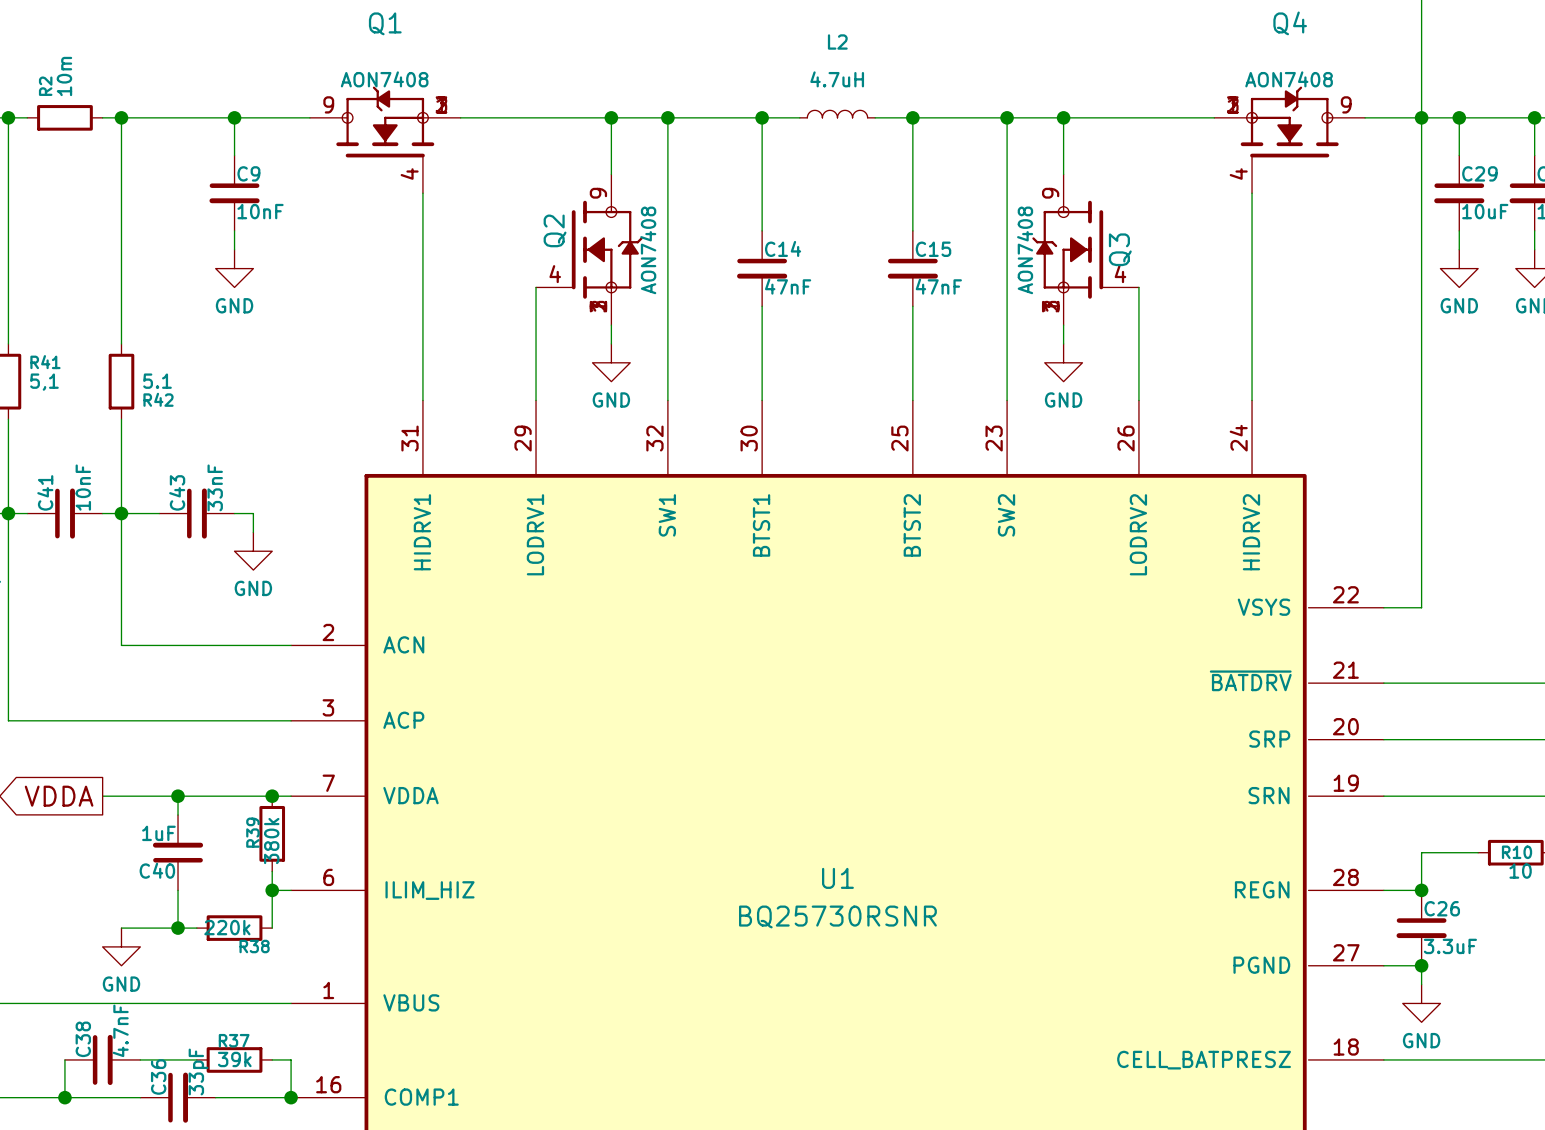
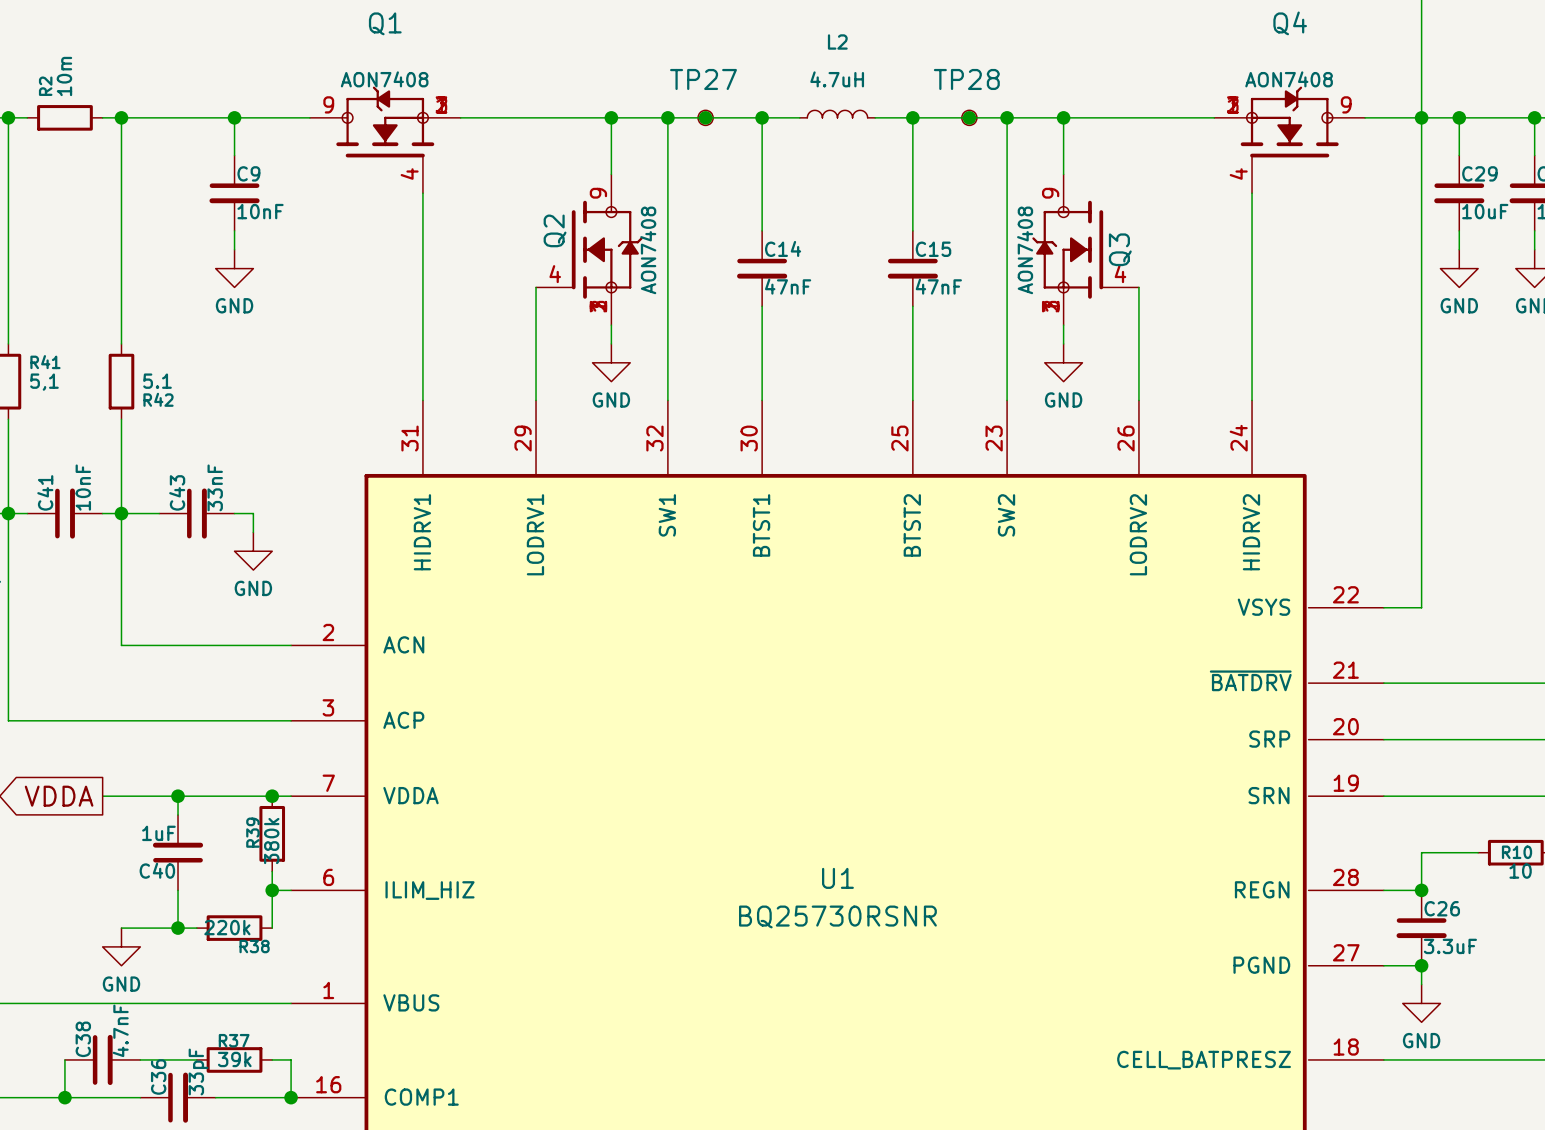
junction: none -> (705, 117)
TP27: none -> (705, 117)
junction: none -> (969, 117)
TP28: none -> (969, 117)

